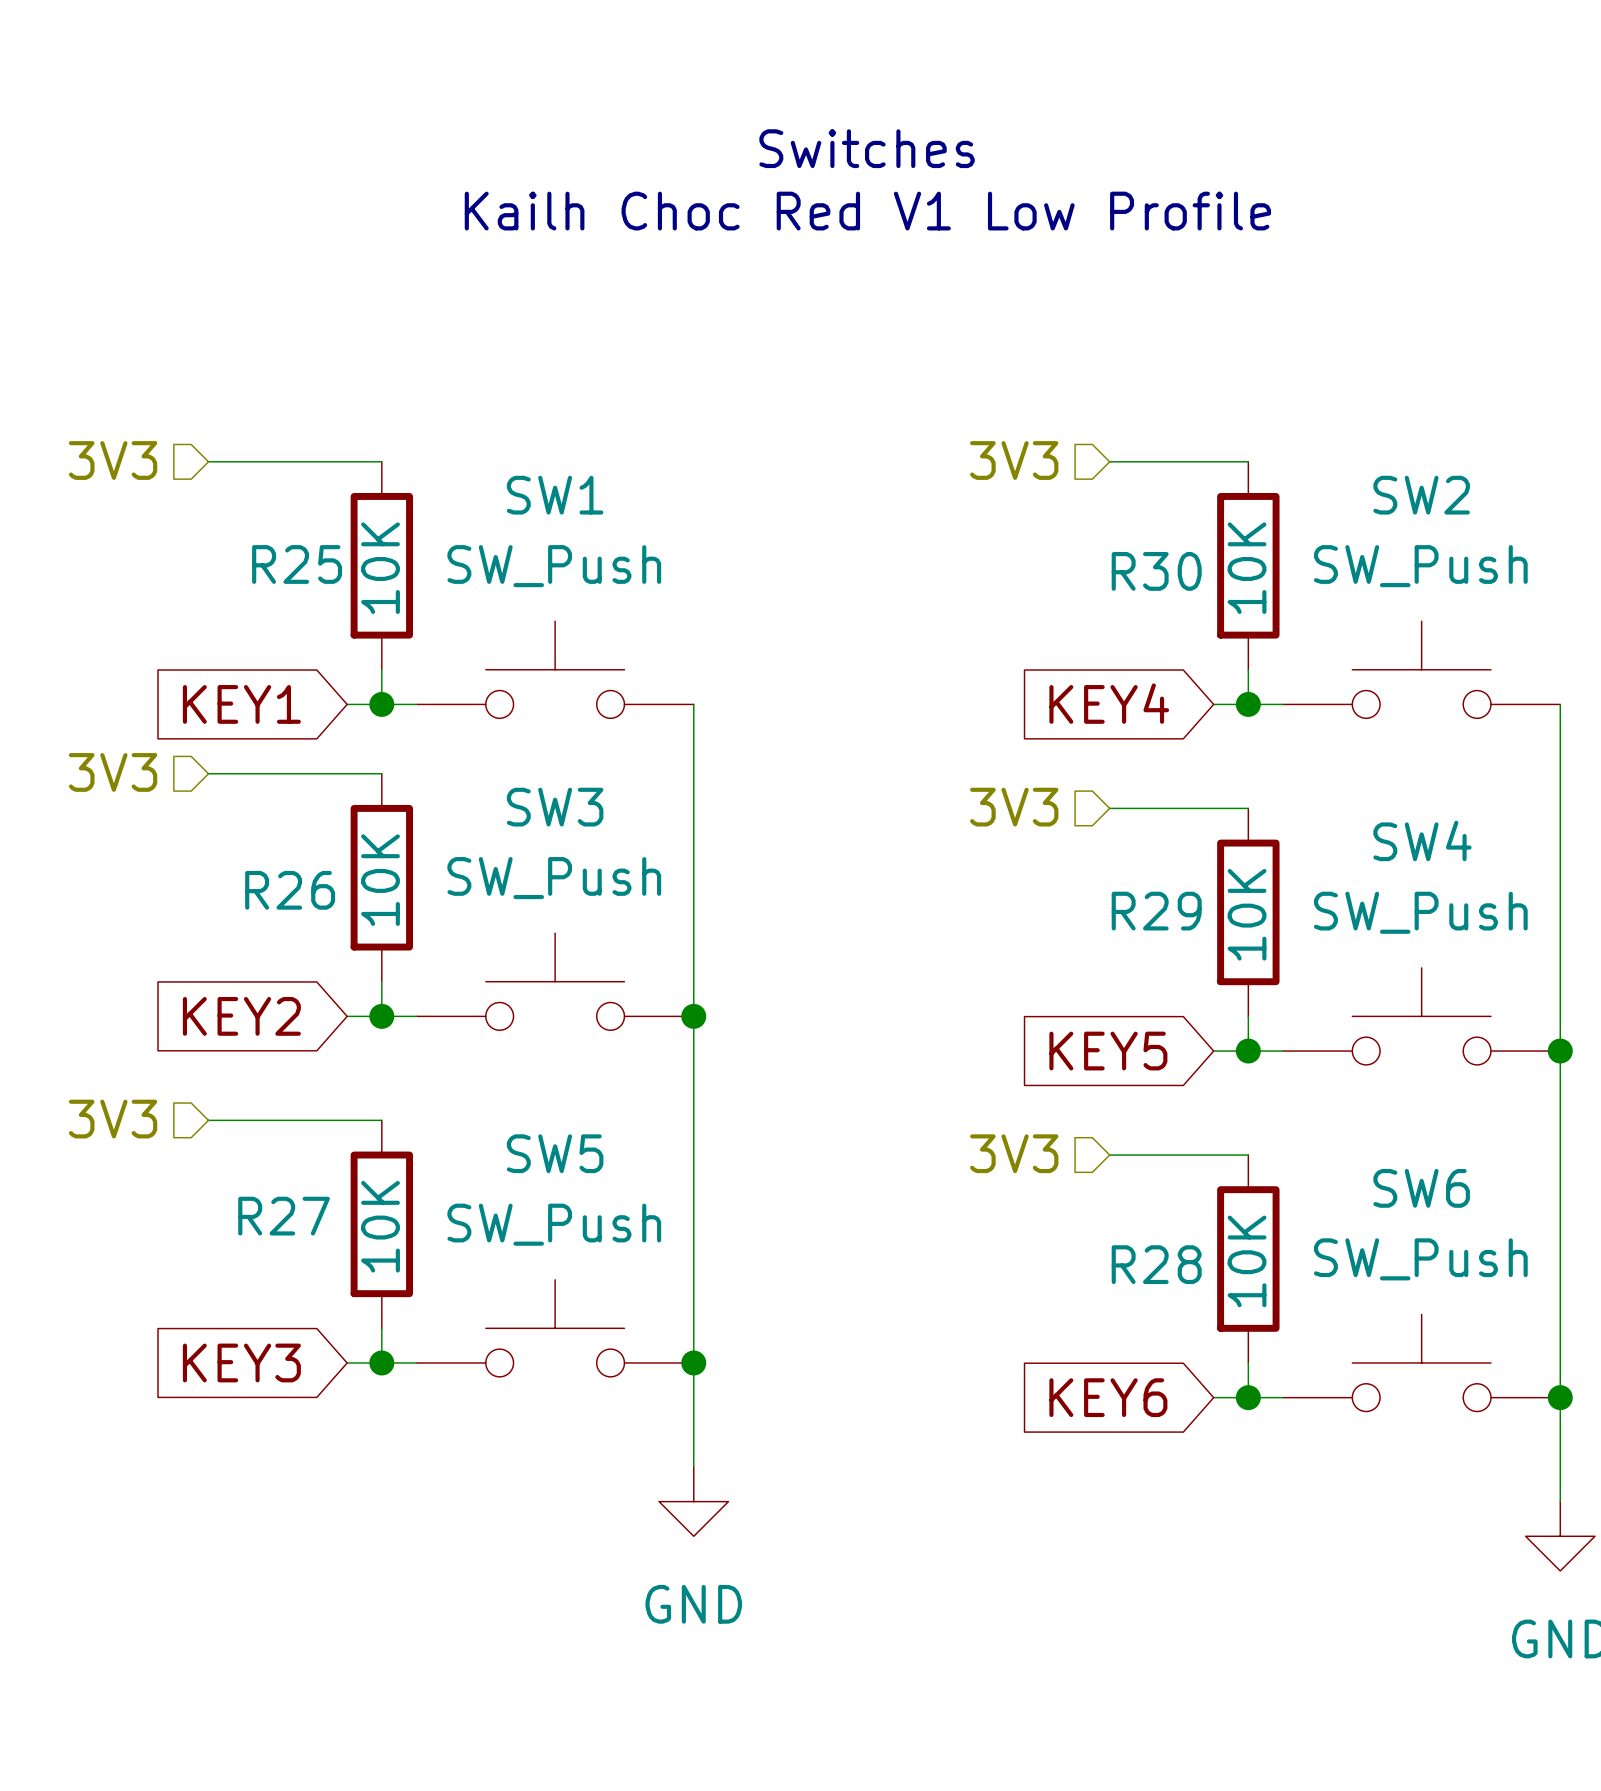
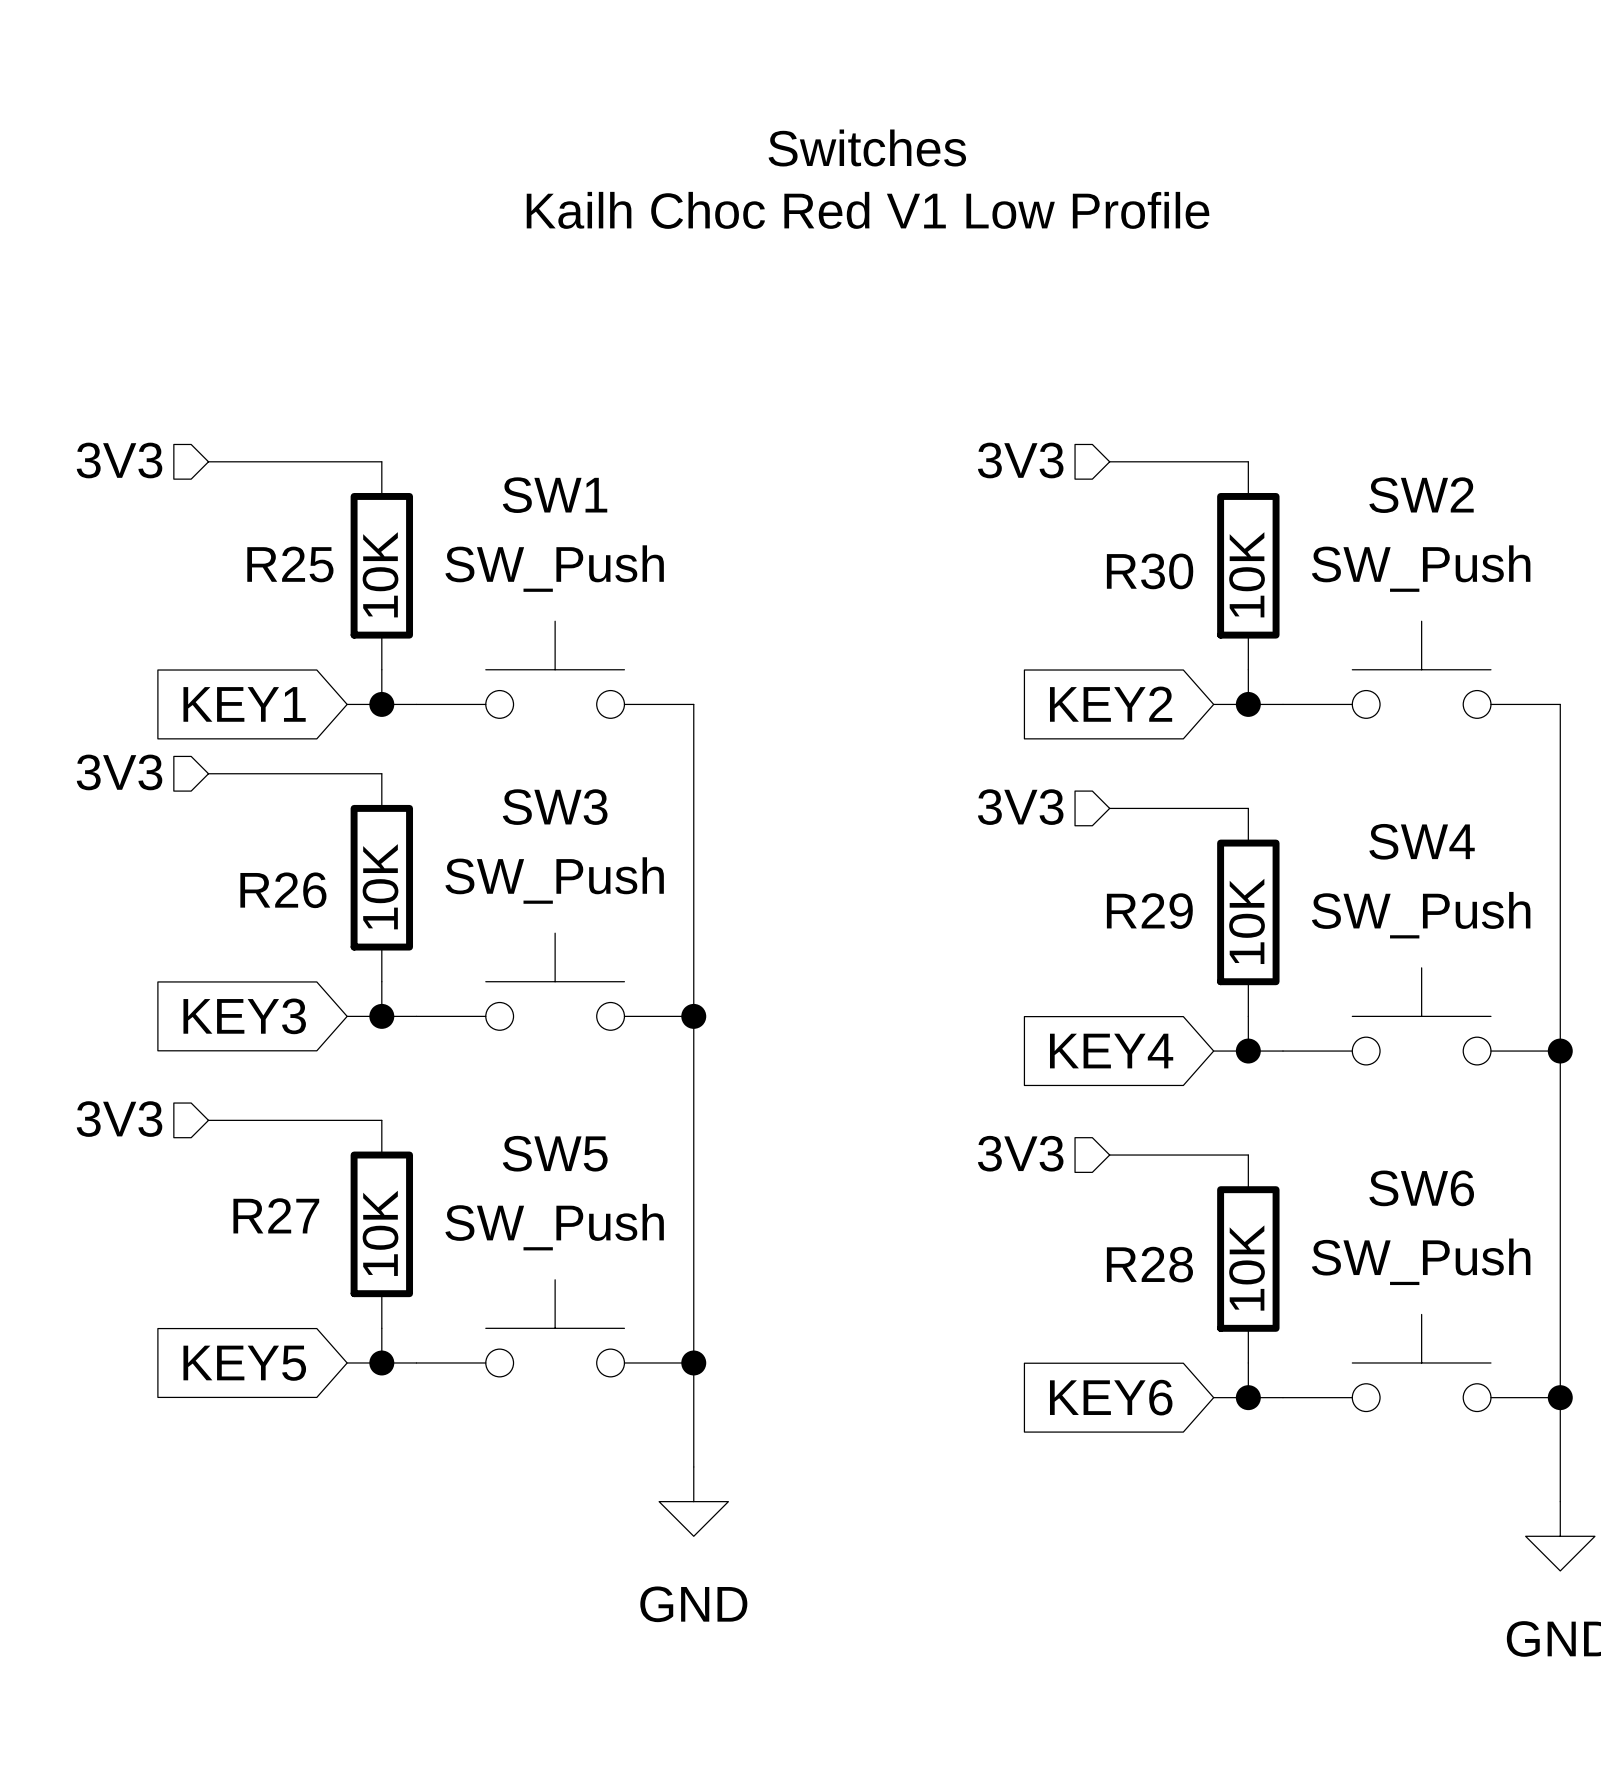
global label: KEY4 (1109, 703) -> KEY2 (1111, 704)
global label: KEY2 (241, 1016) -> KEY3 (244, 1016)
global label: KEY5 (1108, 1051) -> KEY4 (1111, 1051)
global label: KEY3 (241, 1362) -> KEY5 (244, 1363)

